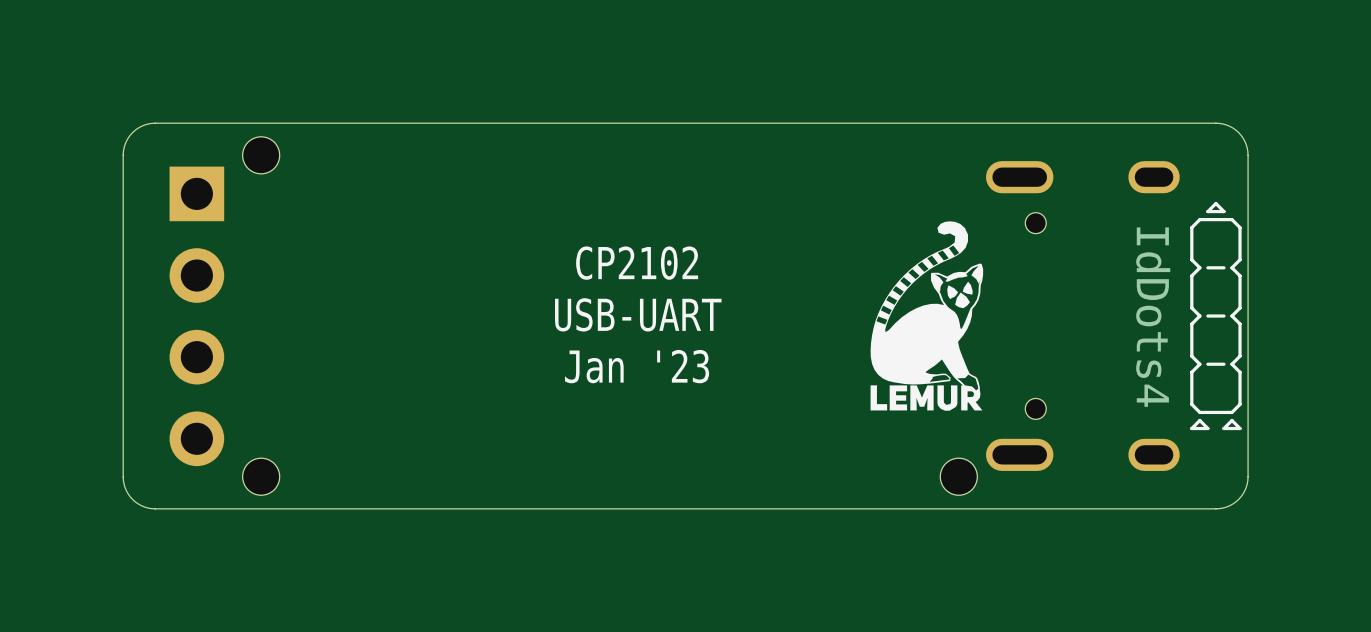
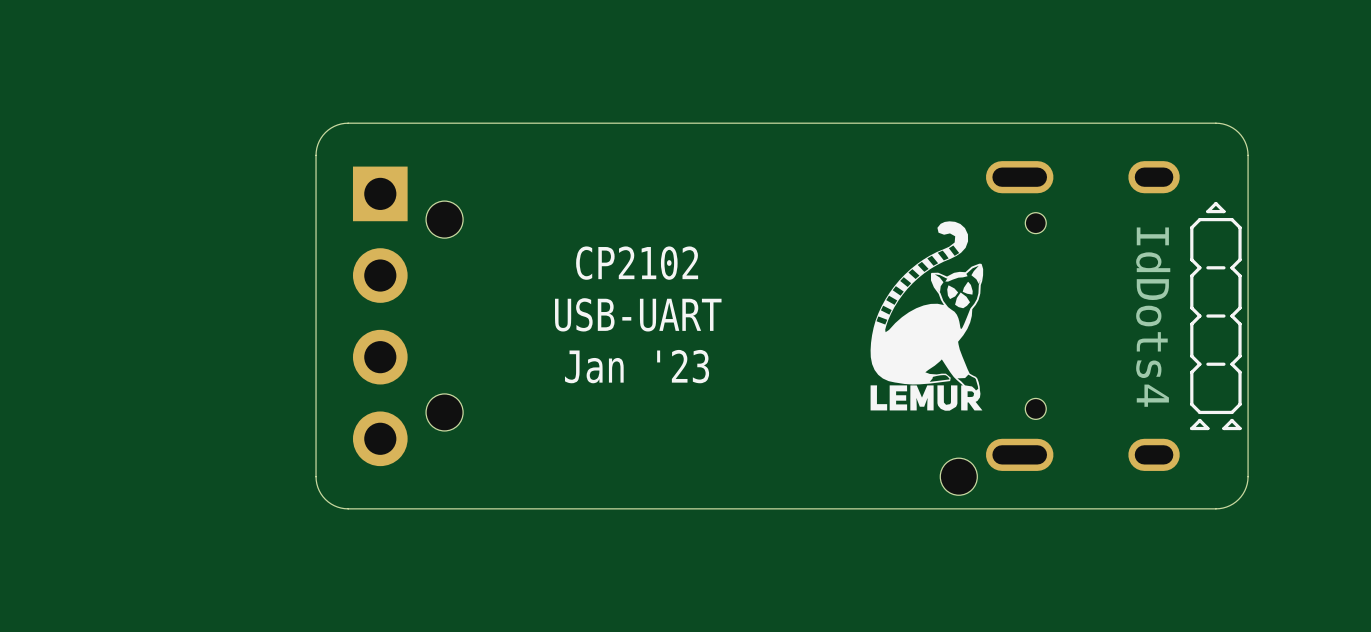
board edge: (348, 123) (151, 123) (141, 126) (132, 132) (126, 141) (123, 155) (123, 476) (128, 493) (138, 503) (151, 508) (348, 508) -> (348, 123) (334, 126) (325, 132) (317, 144) (316, 155) (316, 480) (319, 490) (325, 499) (334, 505) (348, 508)
part: (261, 155) -> none
part: none -> (444, 219)
part position: (196, 316) -> (380, 316)
part: none -> (444, 412)
part: (261, 476) -> none

